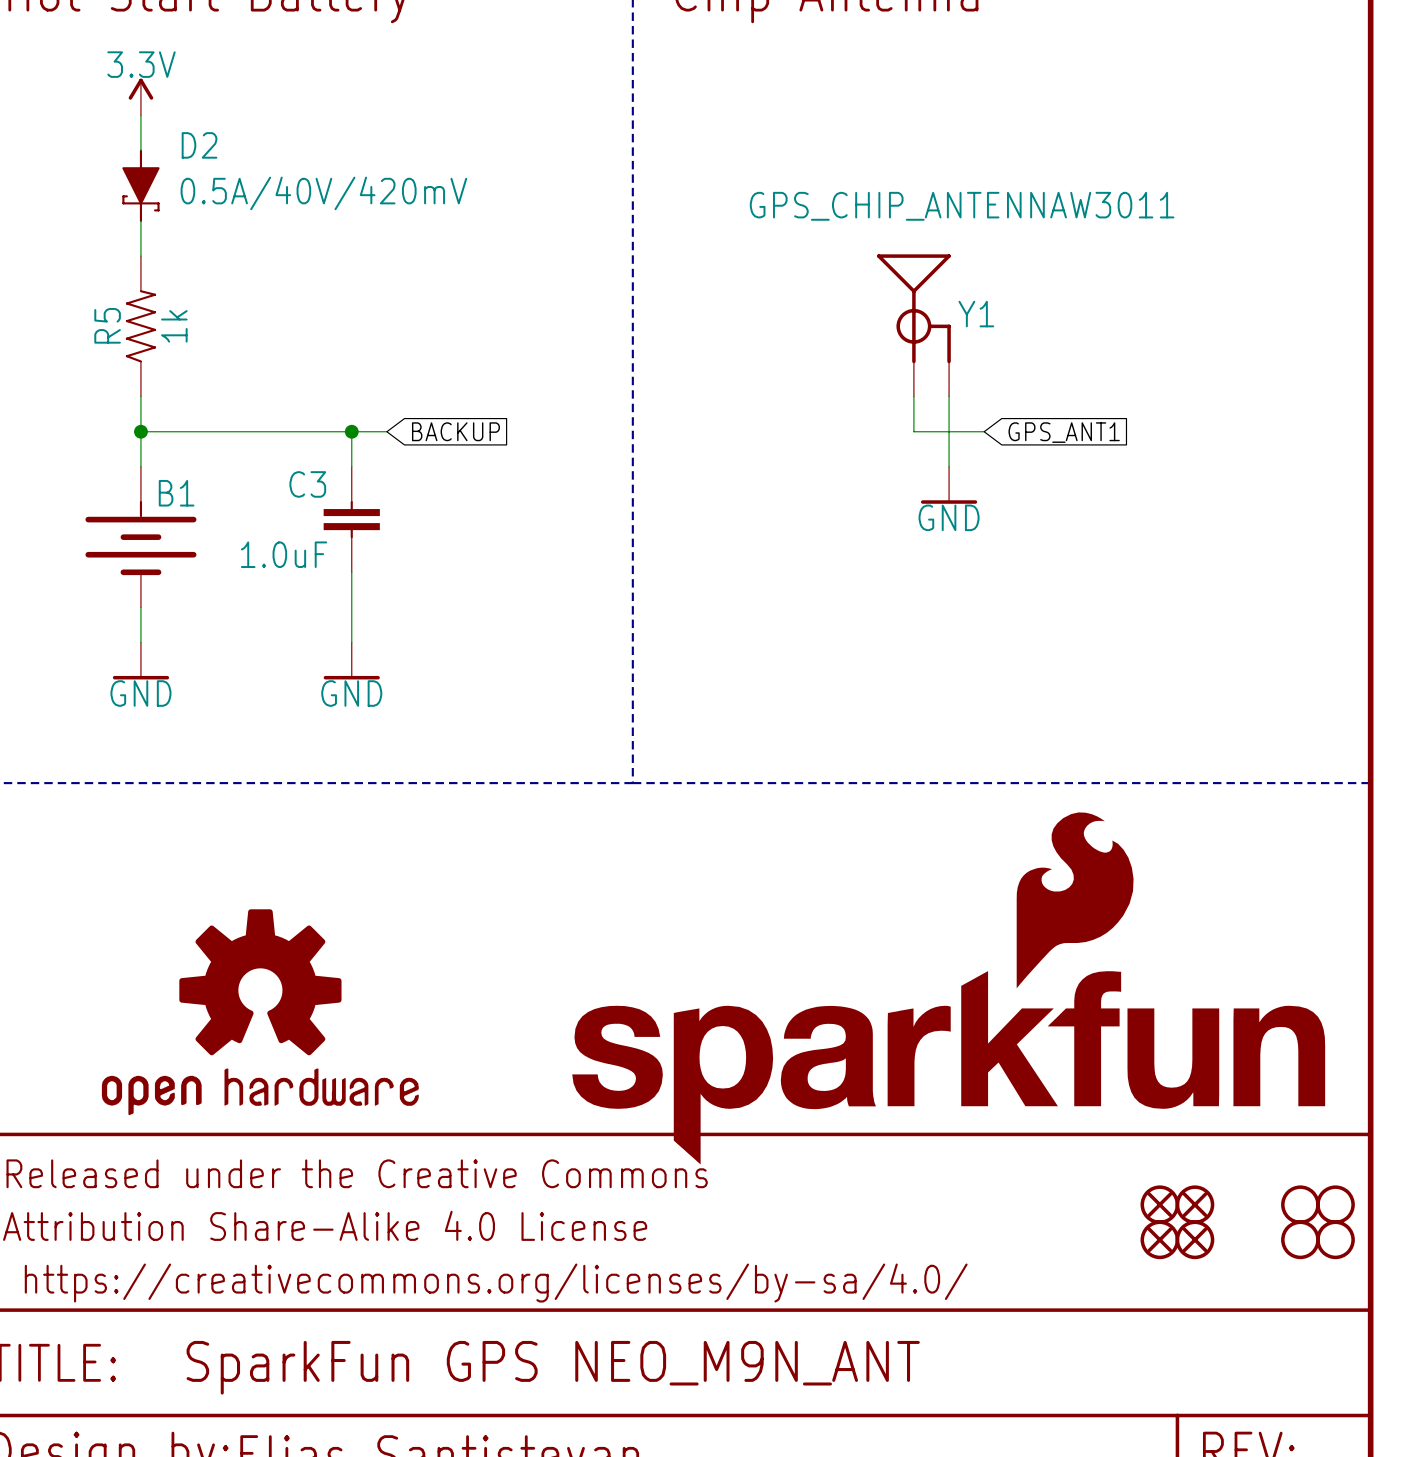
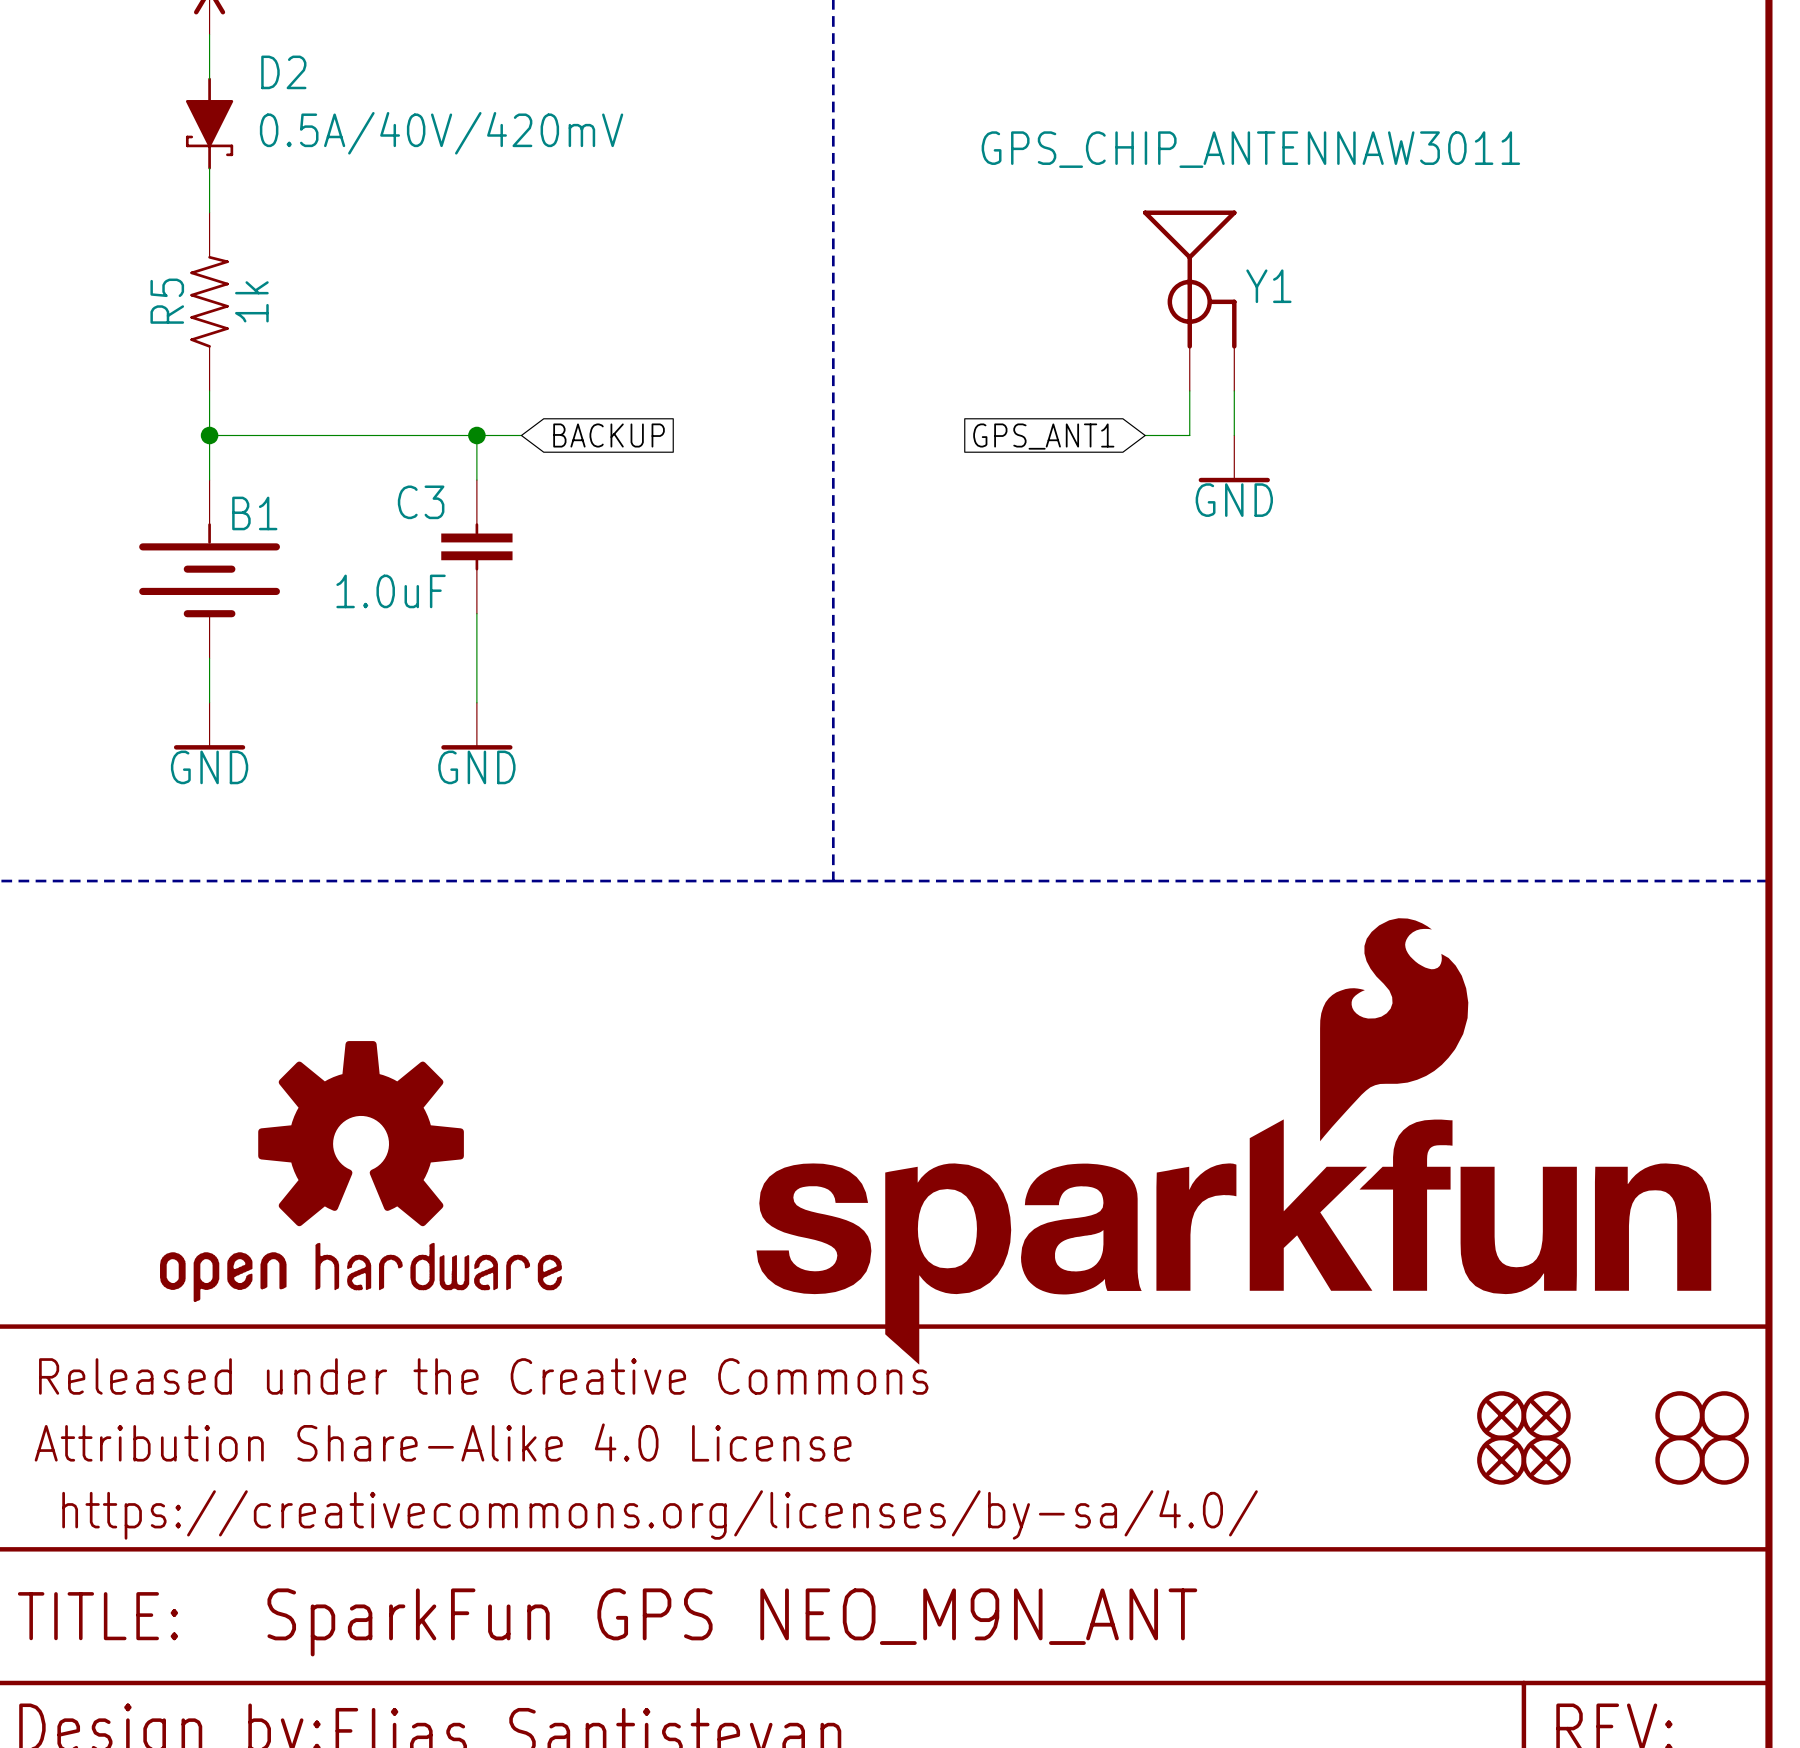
wire: (913, 431) (984, 431) -> (1189, 435) (1145, 435)
global label rotation: 0° (1064, 432) -> 180° (1043, 436)
global label position: GPS_ANT1 (1064, 432) -> GPS_ANT1 (1043, 436)
power symbol position: GND (949, 485) -> GND (1234, 458)

